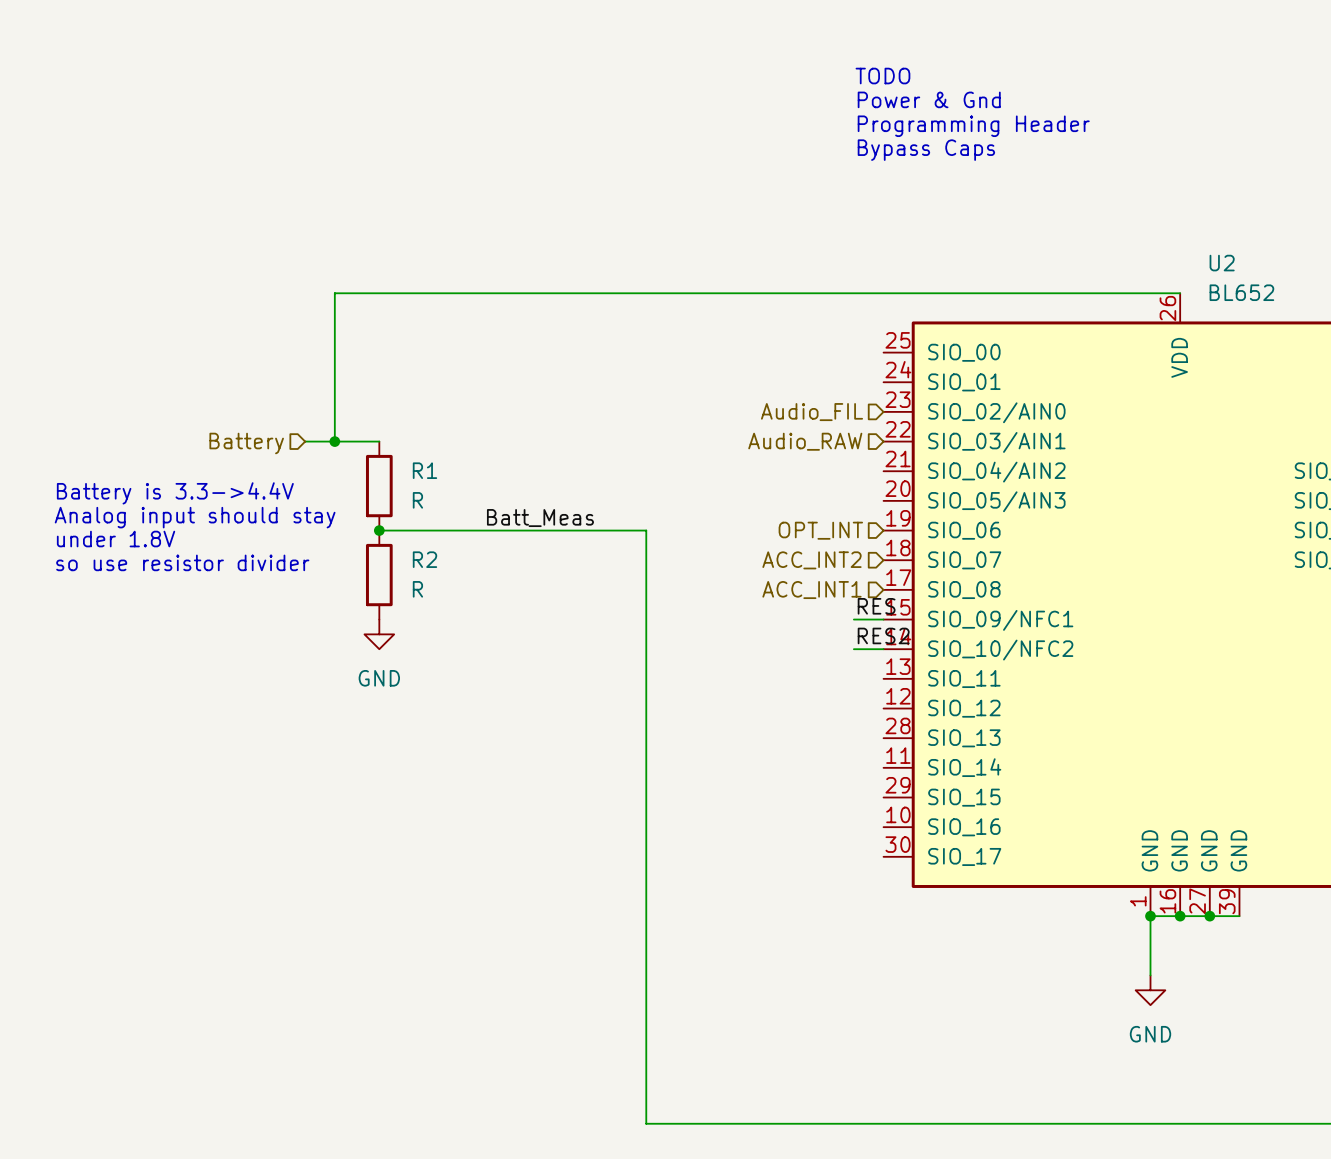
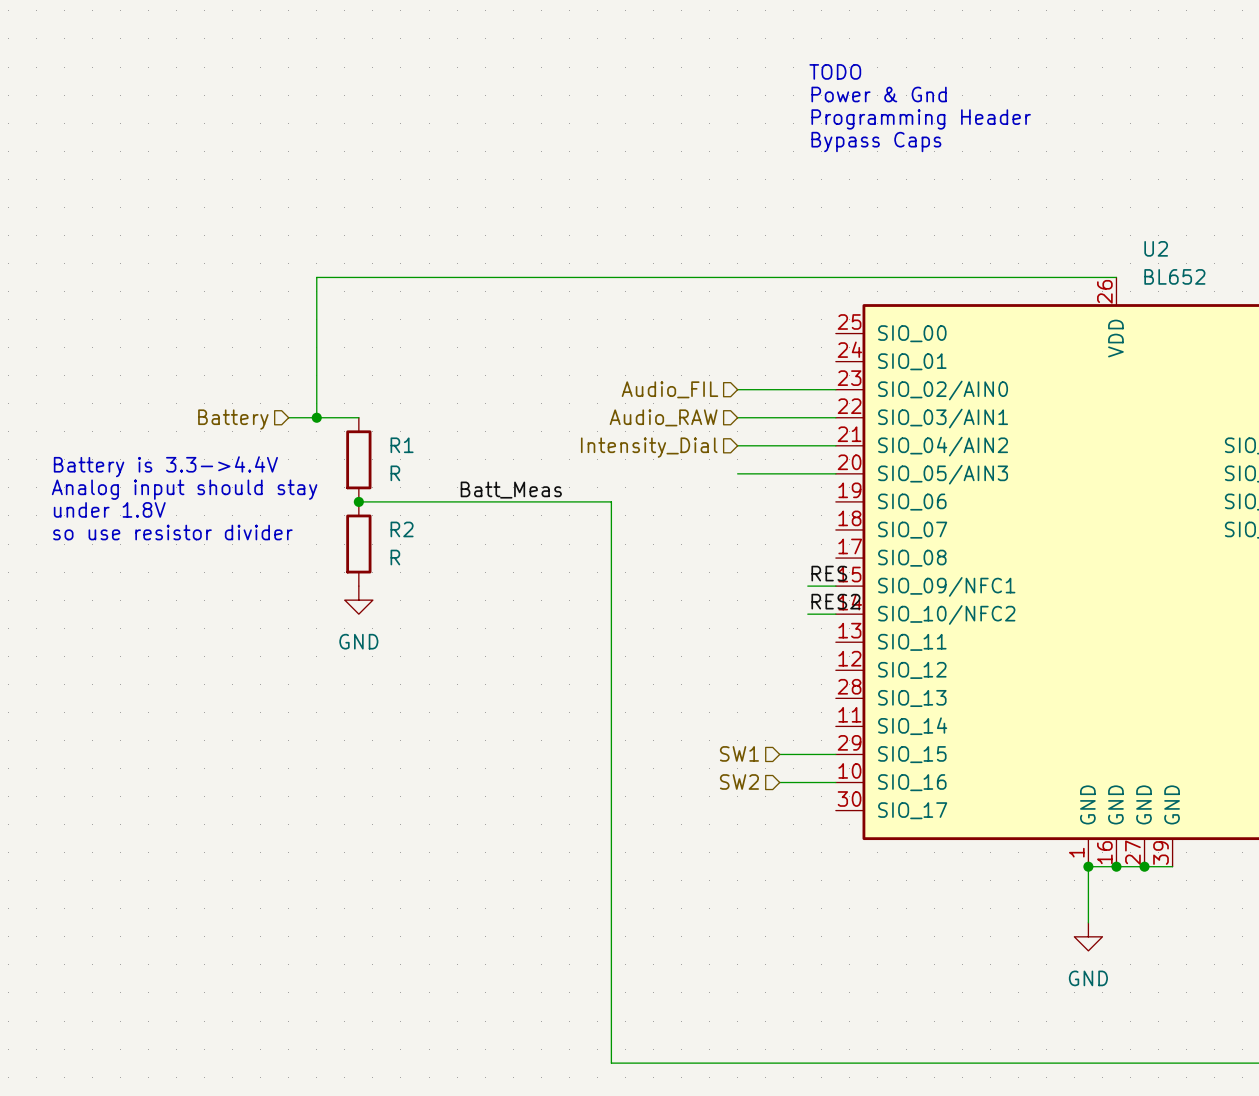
wire: none -> (737, 389) (835, 389)
hierarchical label position: Audio_FIL (811, 412) -> Audio_FIL (669, 389)
wire: none -> (737, 417) (835, 417)
hierarchical label position: Audio_RAW (805, 441) -> Audio_RAW (663, 417)
wire: none -> (737, 445) (835, 445)
hierarchical label: none -> Intensity_Dial (649, 447)
wire: none -> (737, 473) (835, 473)
hierarchical label: OPT_INT (820, 530) -> none
hierarchical label: ACC_INT2 (811, 560) -> none
hierarchical label: ACC_INT1 (811, 590) -> none
hierarchical label: none -> SW1 (739, 753)
wire: none -> (779, 754) (835, 754)
hierarchical label: none -> SW2 (739, 781)
wire: none -> (779, 782) (835, 782)

